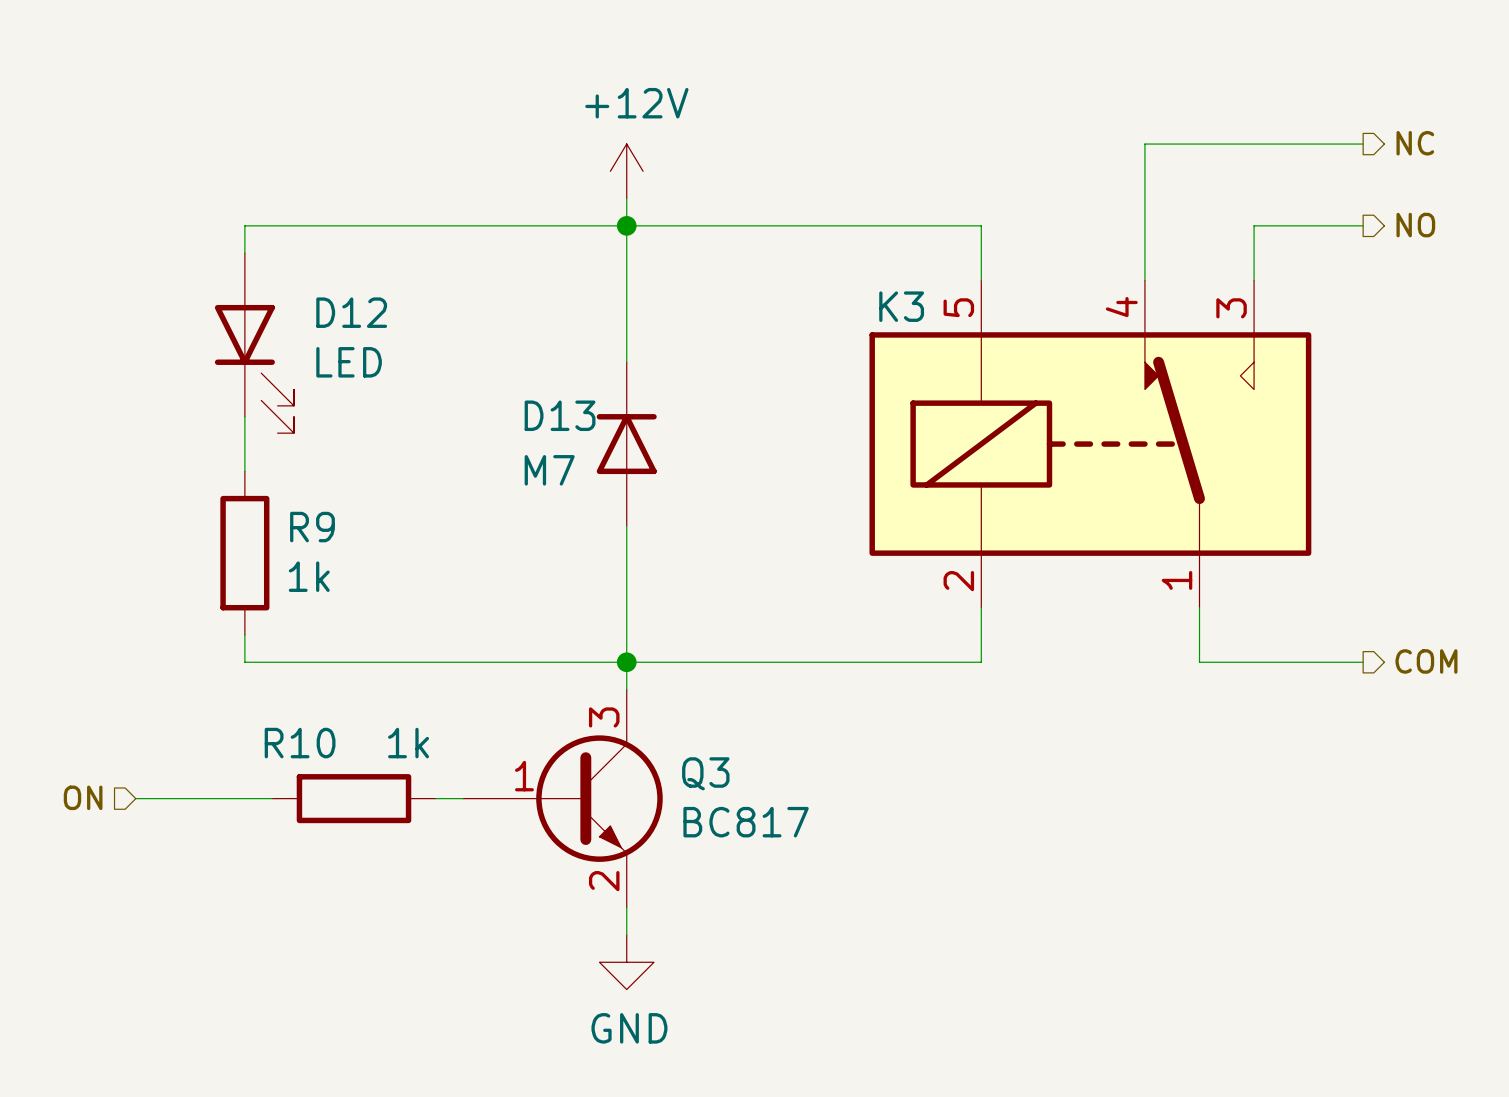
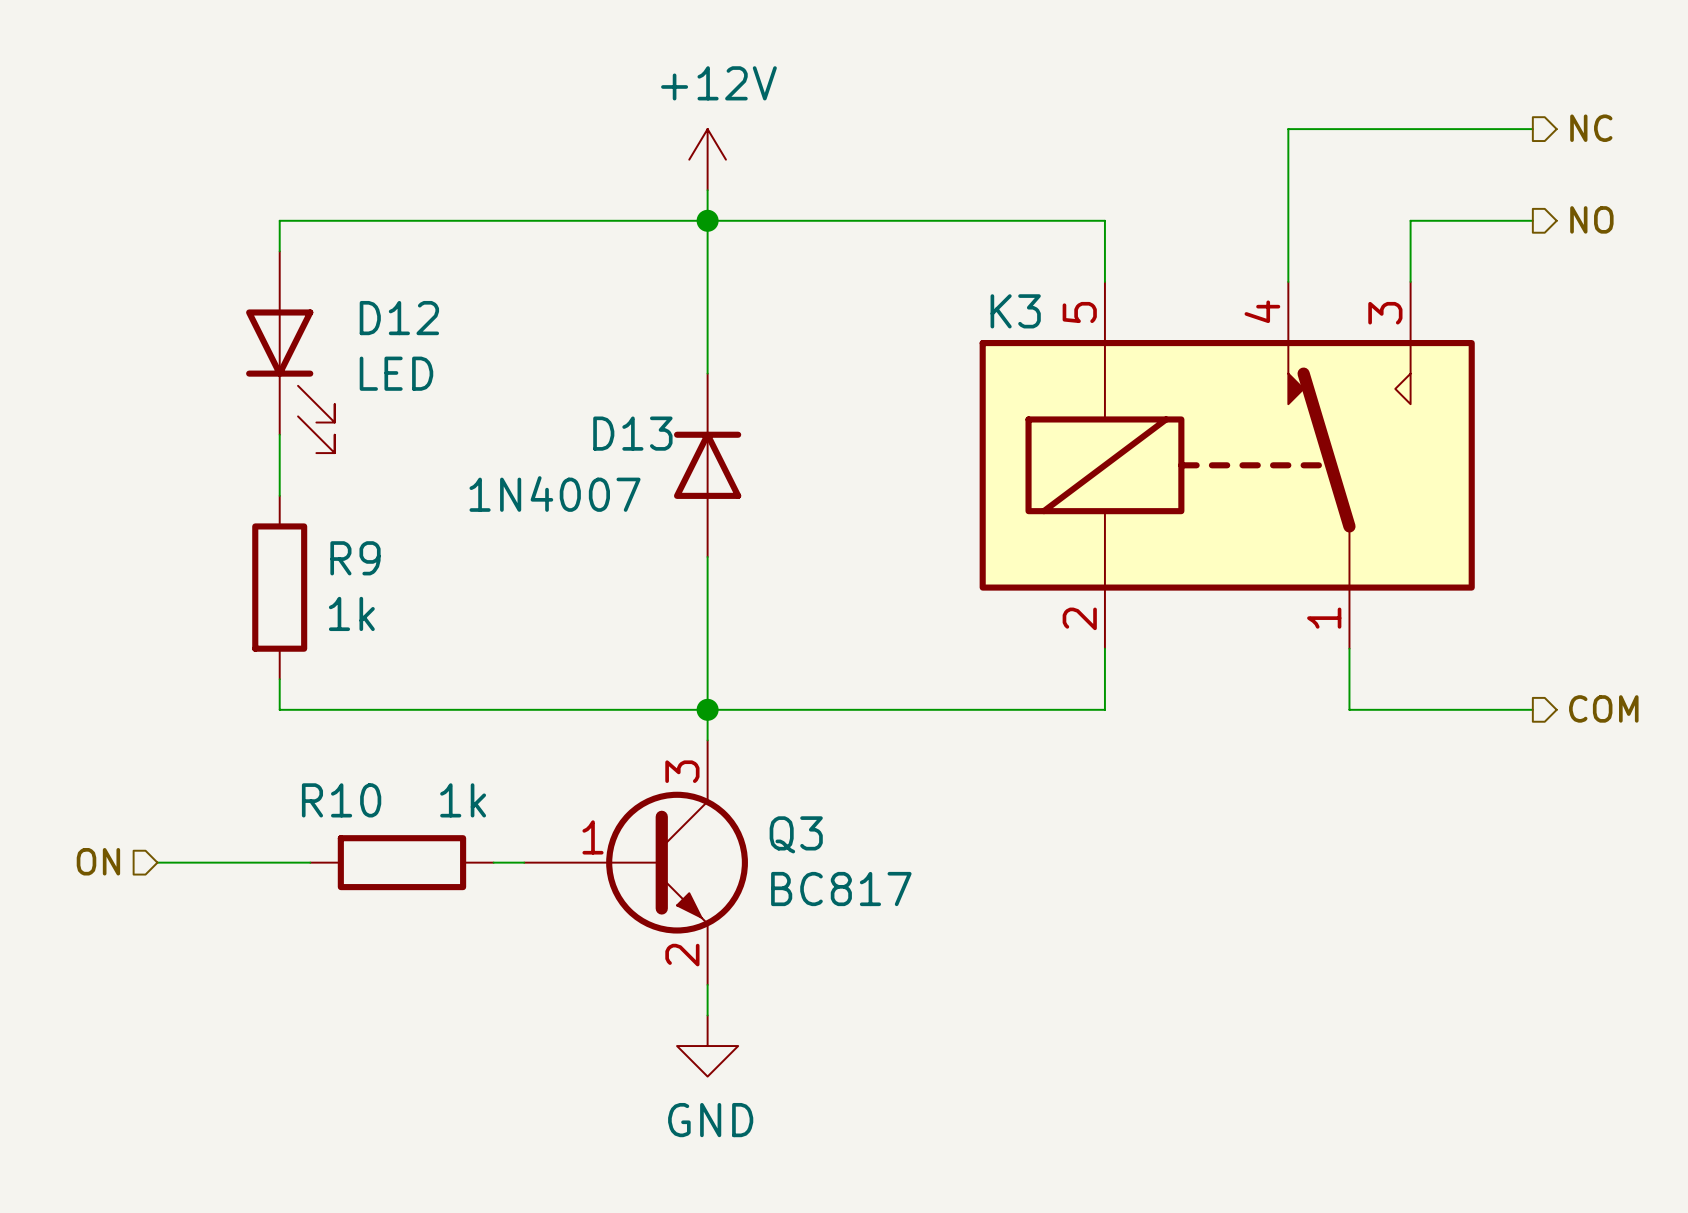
D13 value: M7 (549, 470) -> 1N4007 (555, 494)

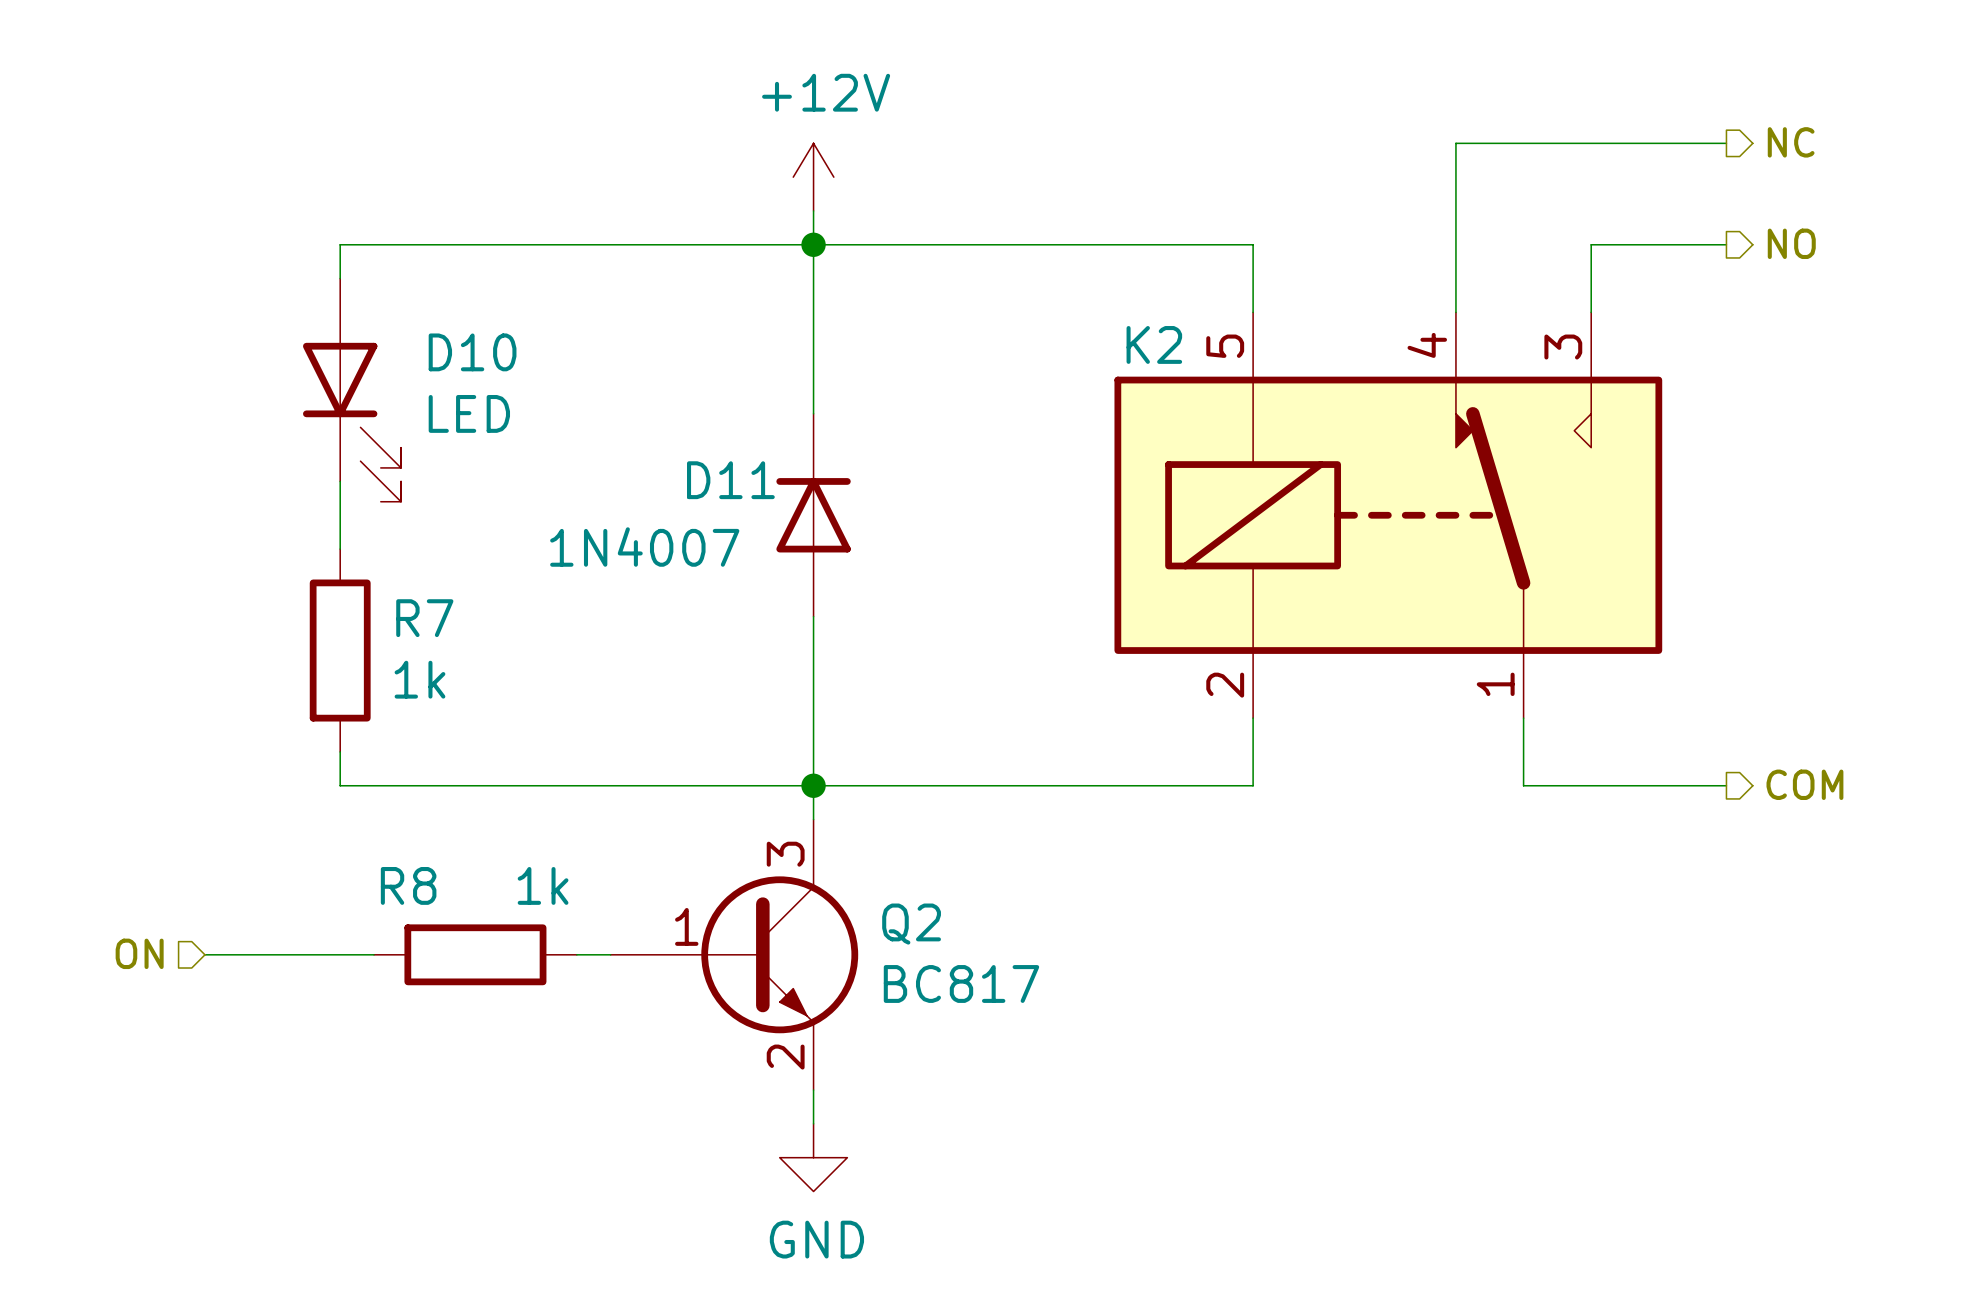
K3 name: K3 (1015, 311) -> K2 (1154, 344)
D12 name: D12 (399, 318) -> D10 (472, 352)
D13 name: D13 (632, 433) -> D11 (730, 480)
R9 name: R9 (355, 558) -> R7 (424, 618)
R10 name: R10 (341, 800) -> R8 (408, 885)
Q3 name: Q3 (796, 834) -> Q2 (911, 924)

